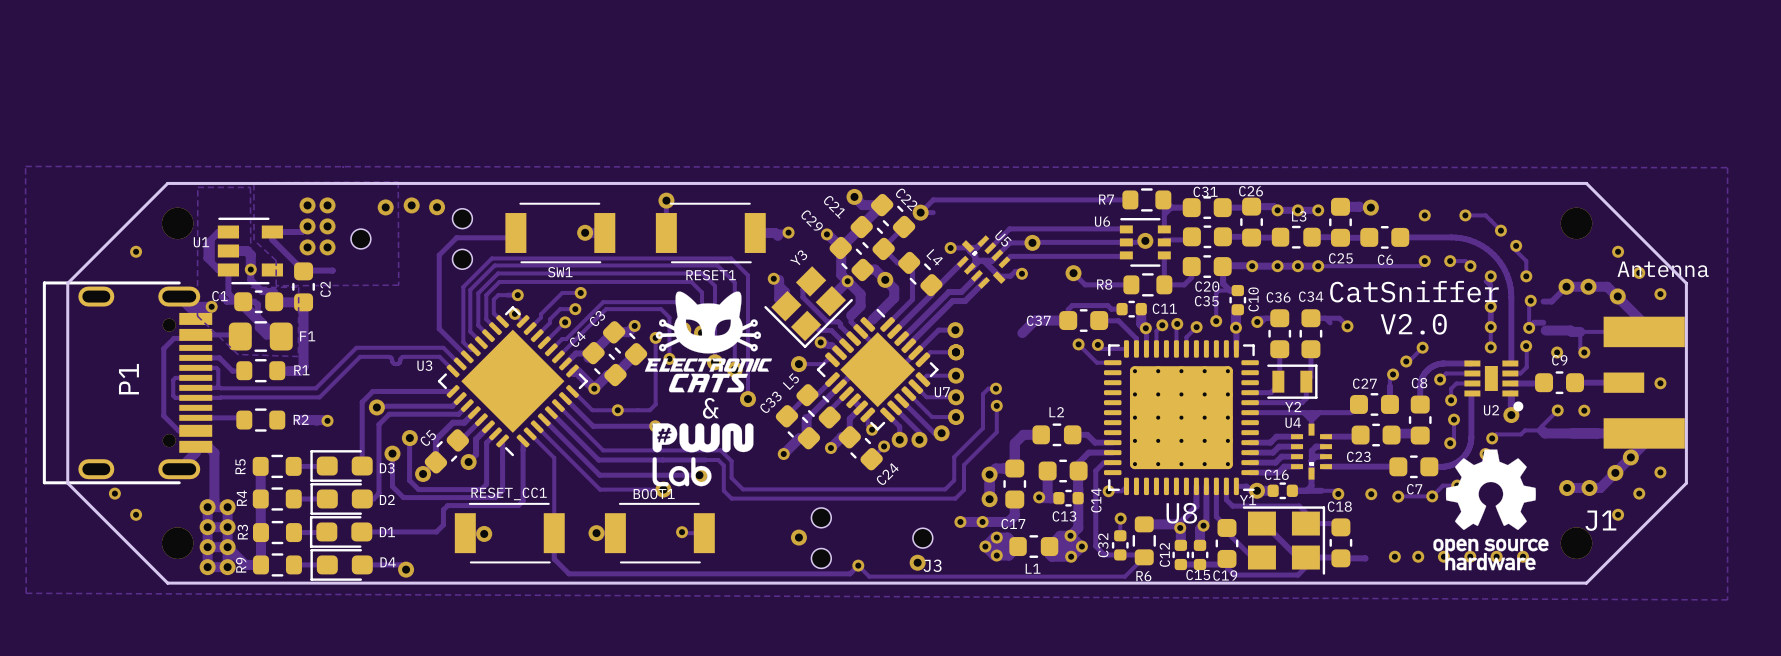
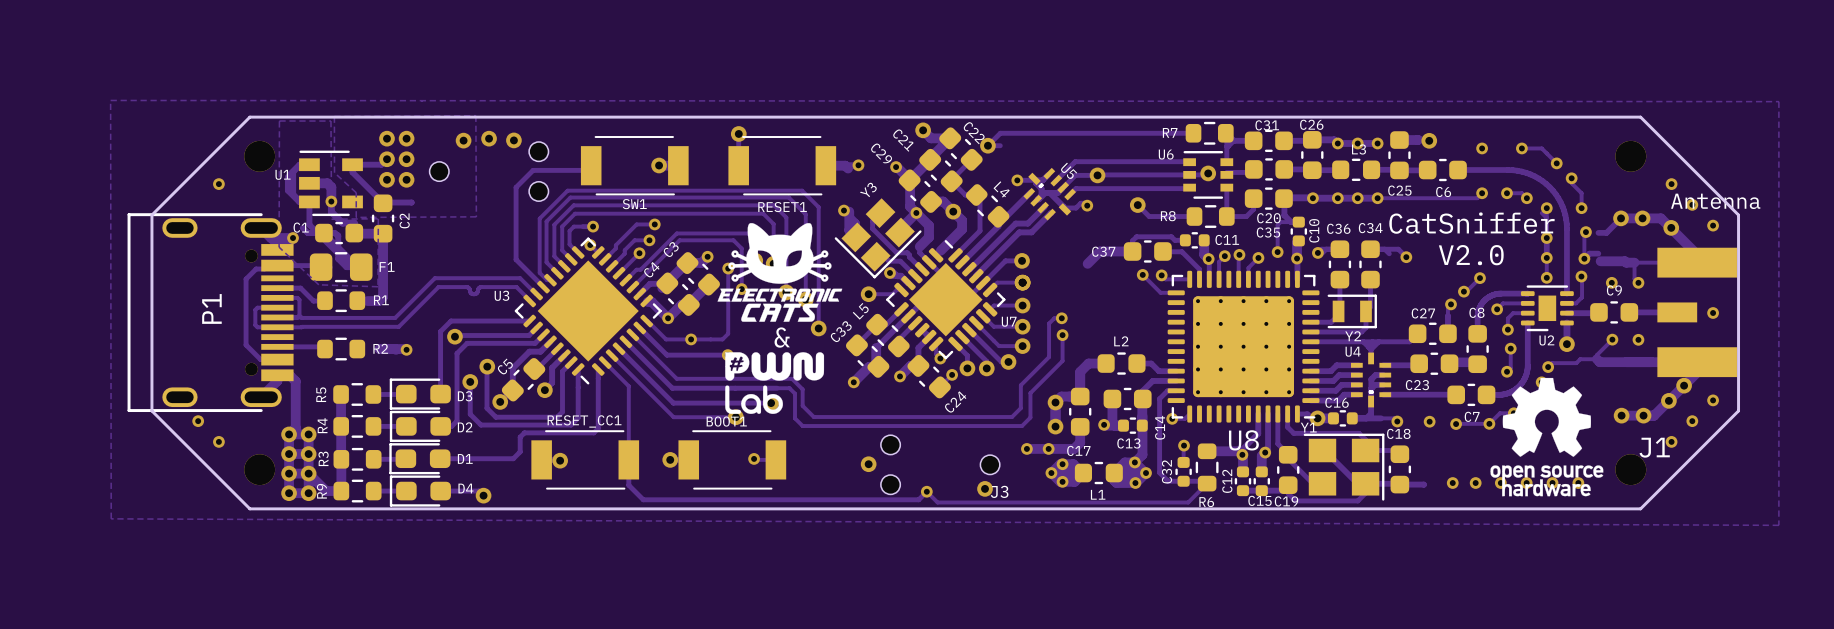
U2 footprint: [1464, 360, 1524, 412] -> [1520, 285, 1574, 332]

